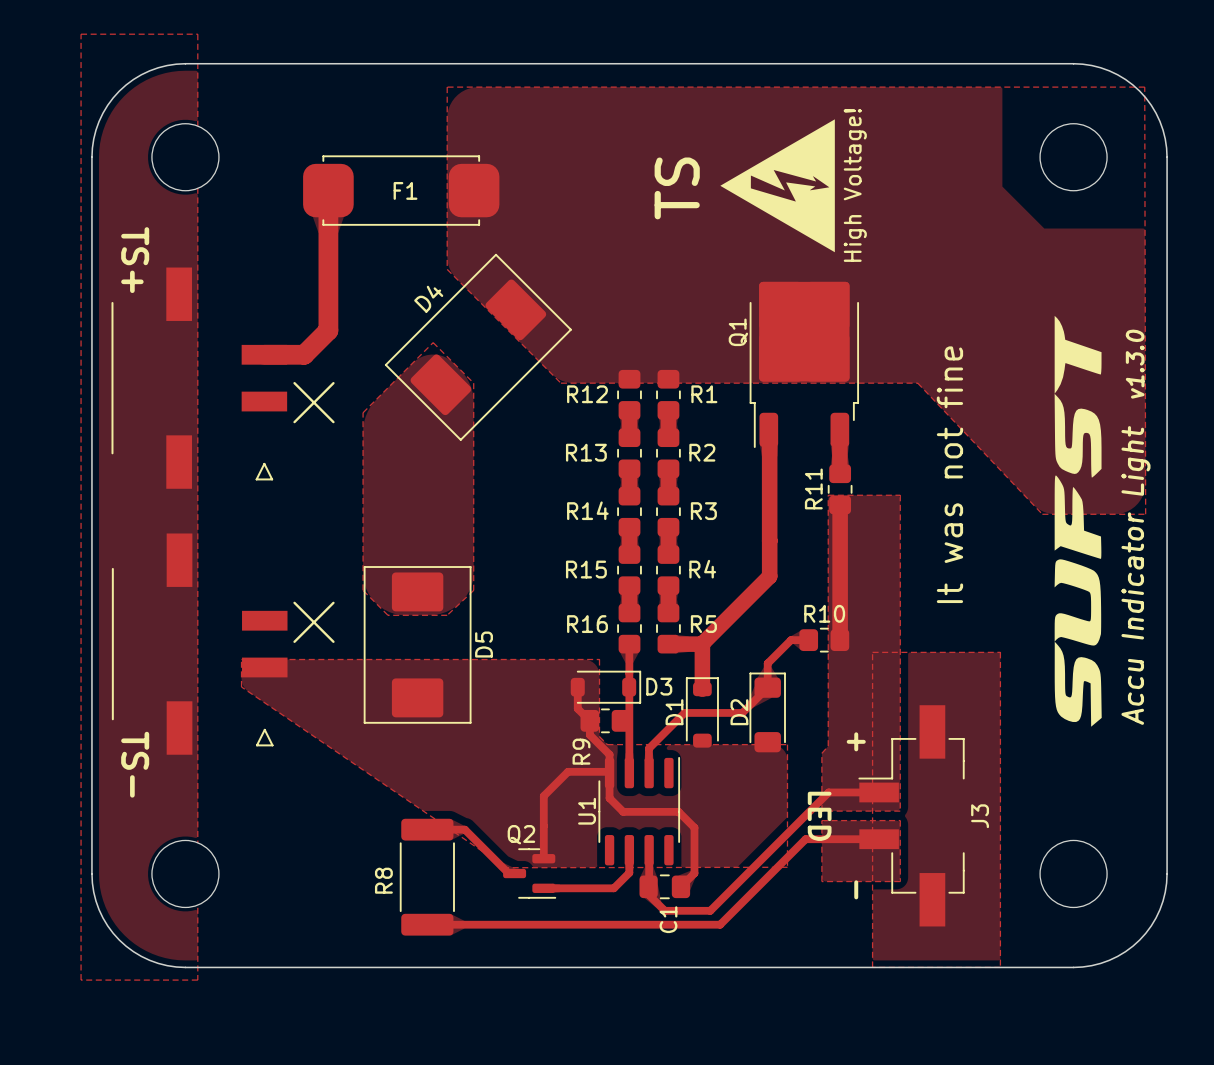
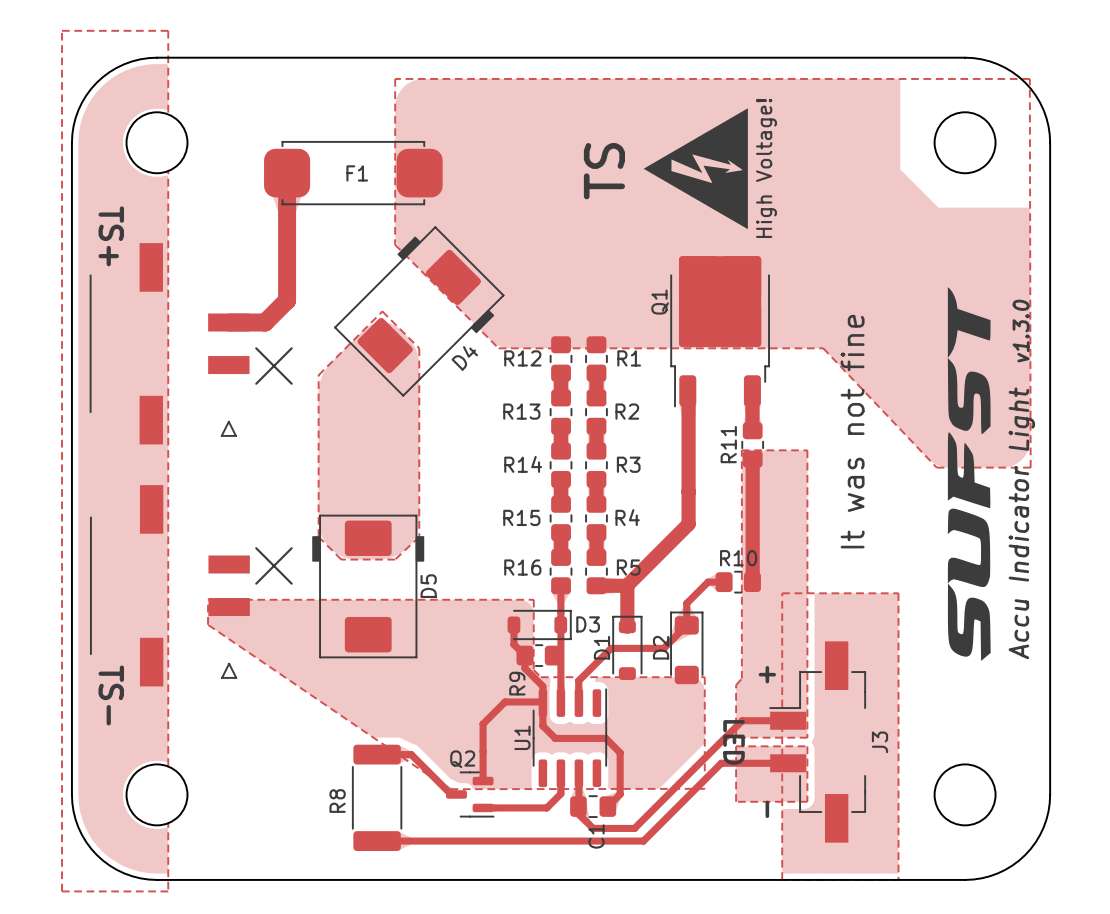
D4 footprint: [384, 253, 572, 441] -> [334, 226, 505, 397]
D4 name position: D4 (428, 299) -> D4 (464, 358)
D5 footprint: [363, 566, 472, 724] -> [312, 514, 425, 659]

